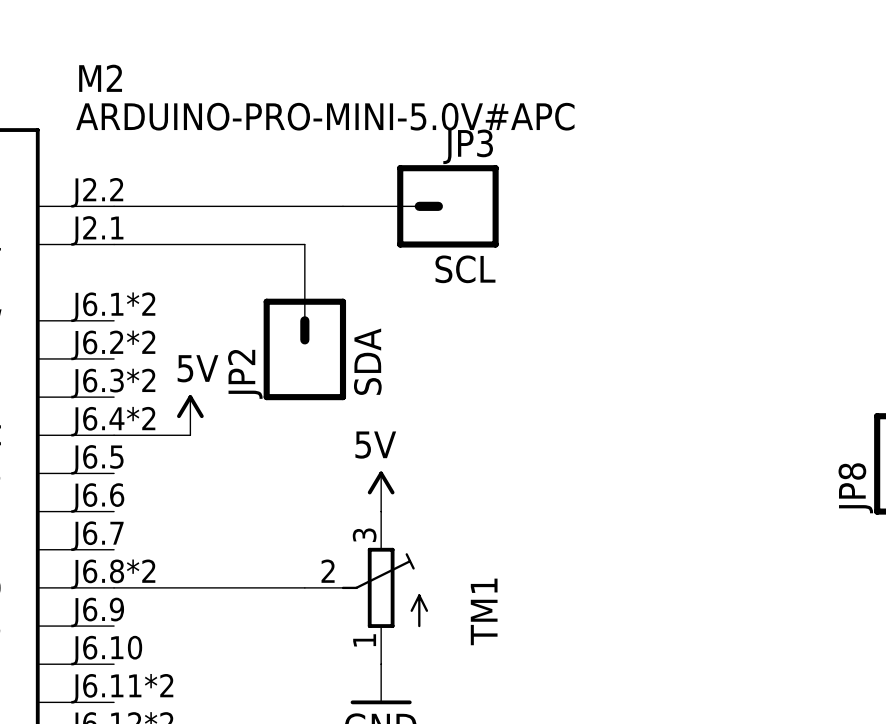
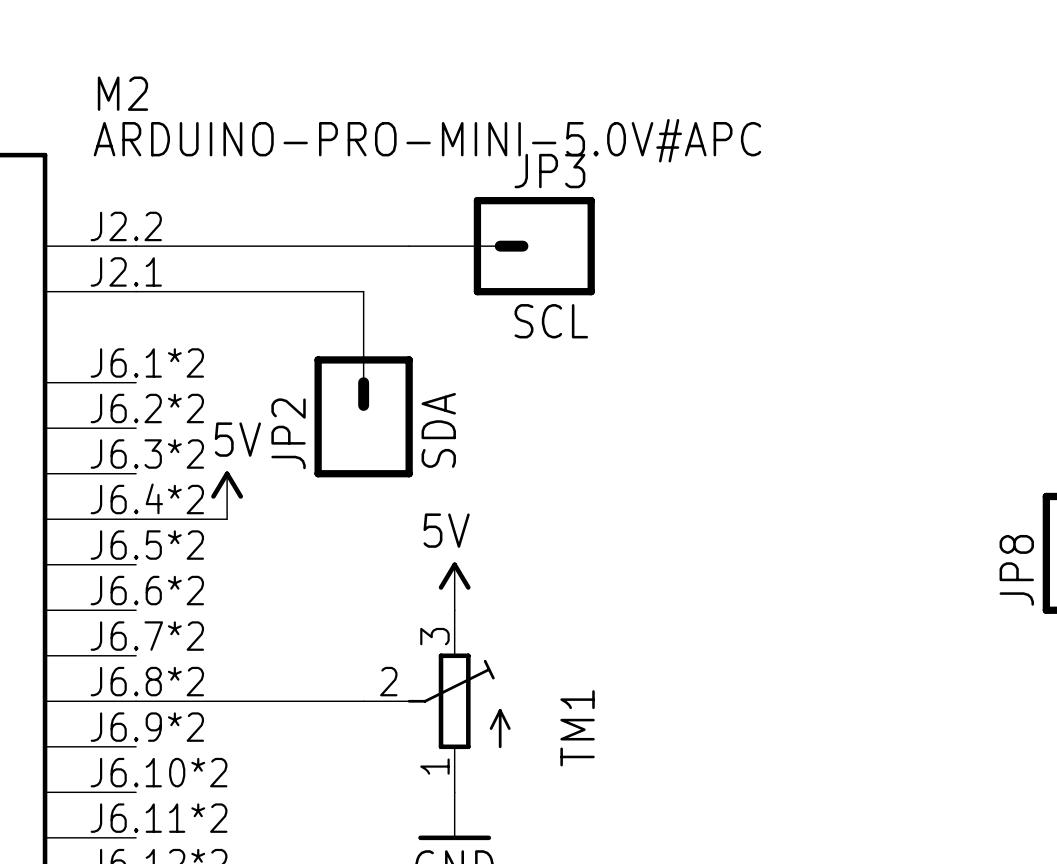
M2 pin number: J6.5 (97, 459) -> J6.5*2 (147, 545)
M2 pin number: J6.6 (97, 498) -> J6.6*2 (147, 590)
M2 pin number: J6.7 (97, 536) -> J6.7*2 (147, 636)
M2 pin number: J6.9 (97, 612) -> J6.9*2 (147, 727)
M2 pin number: J6.10 (106, 650) -> J6.10*2 (159, 772)

